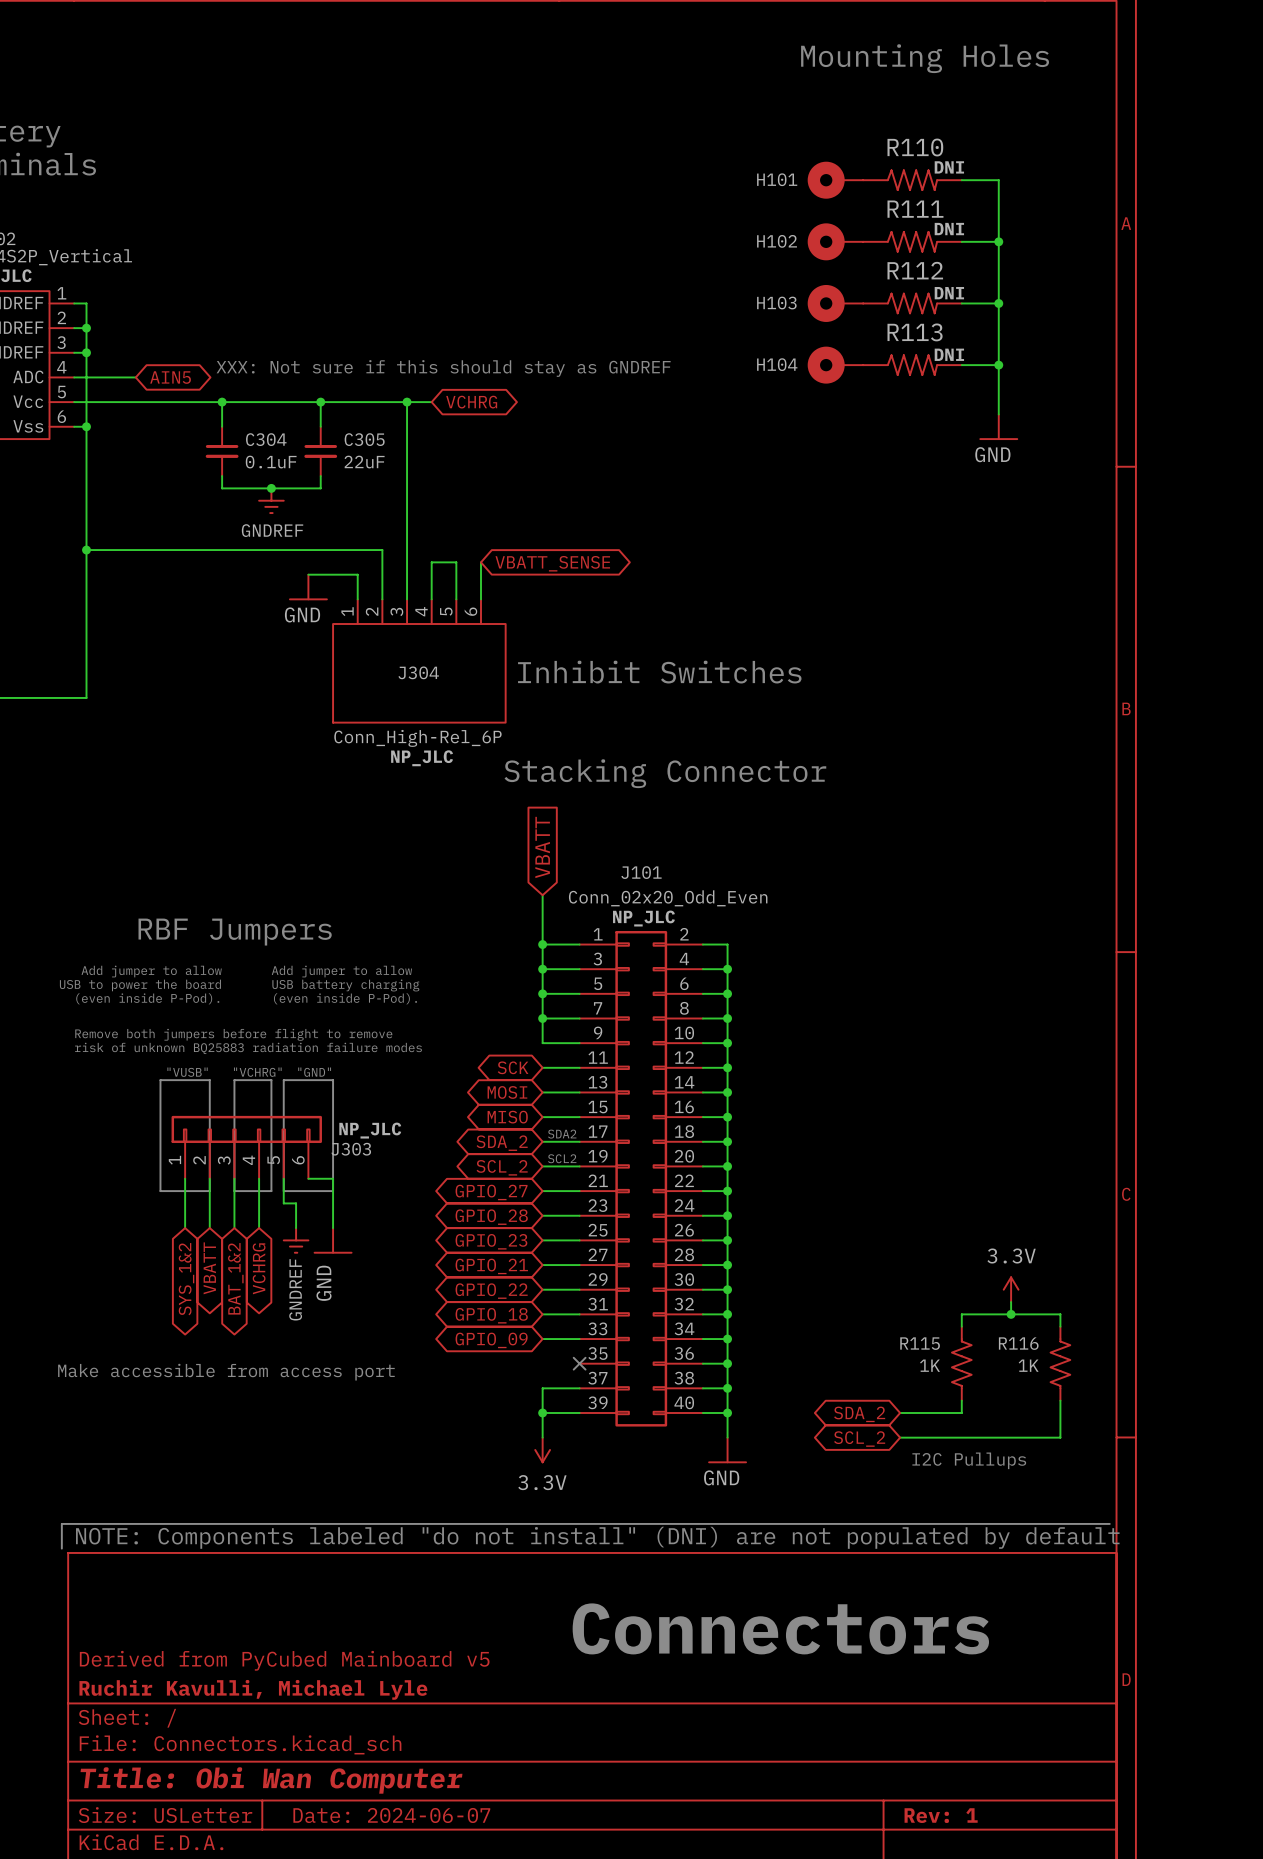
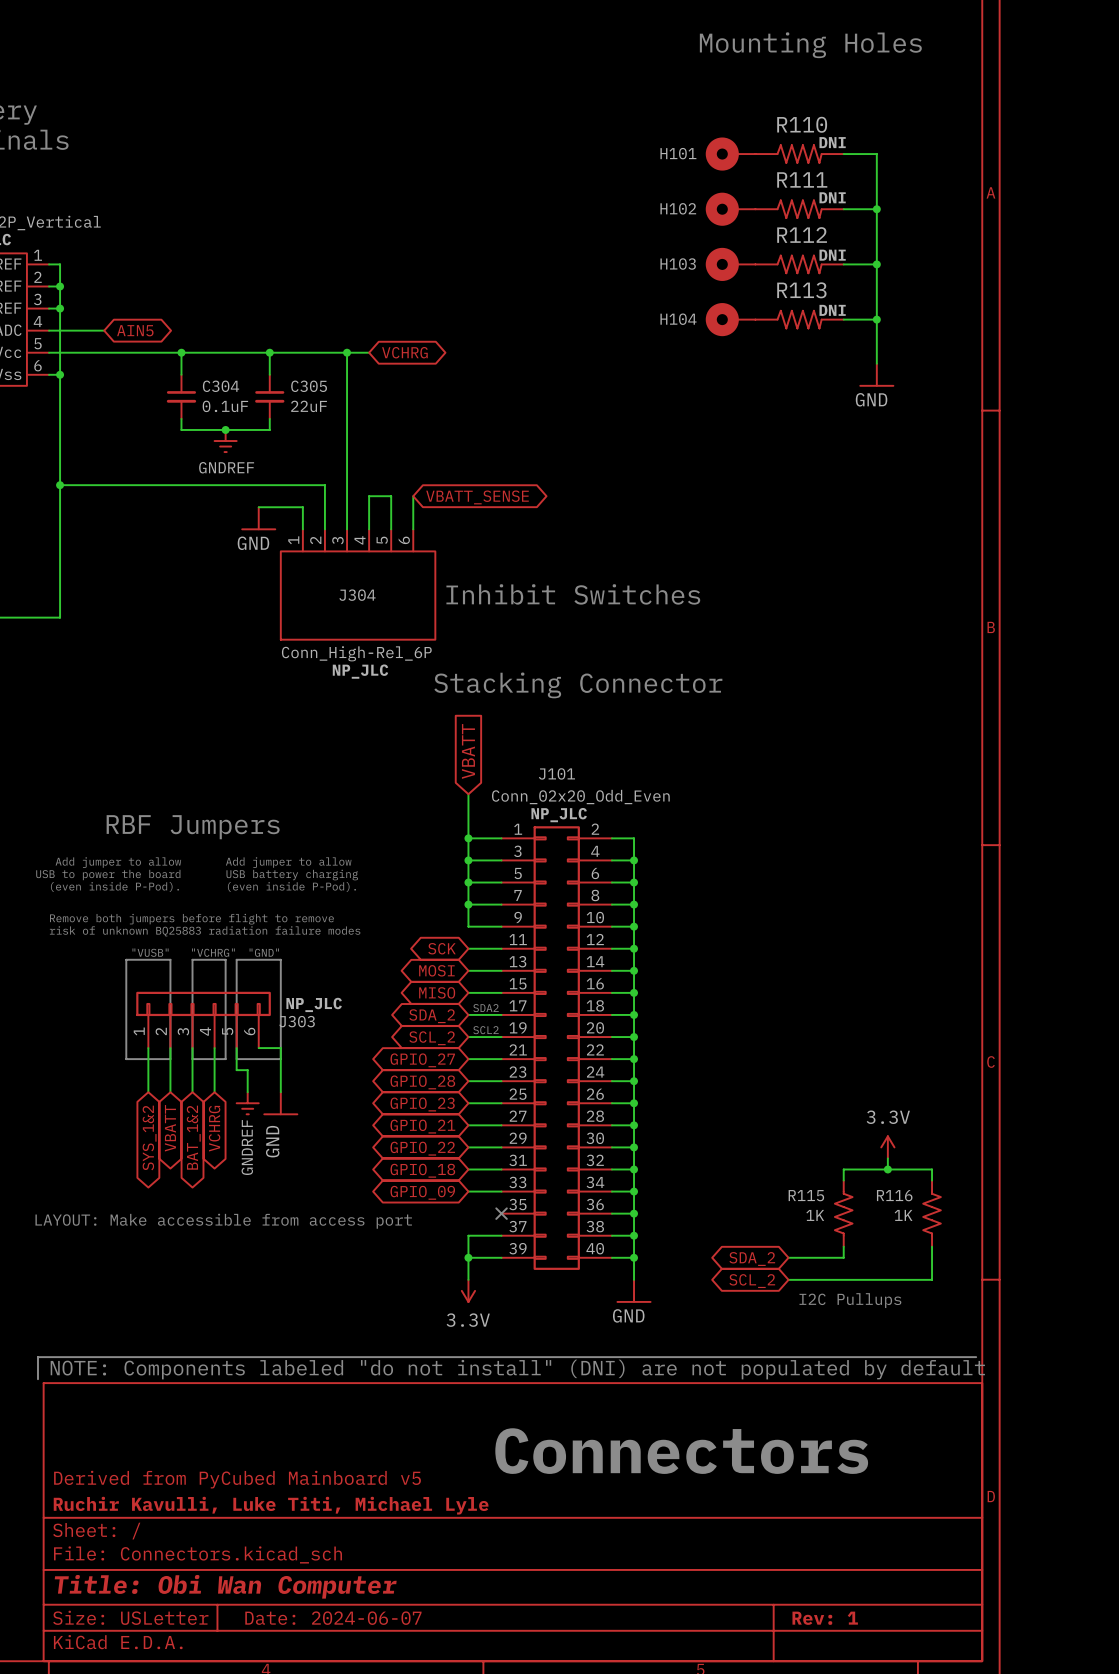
text: XXX: Not sure if this should stay as GNDREF (443, 368) -> none
text: Make accessible from access port (226, 1372) -> LAYOUT: Make accessible from access port (223, 1221)
title block: Ruchir Kavulli, Michael Lyle (253, 1689) -> Ruchir Kavulli, Luke Titi, Michael Lyle (271, 1505)

